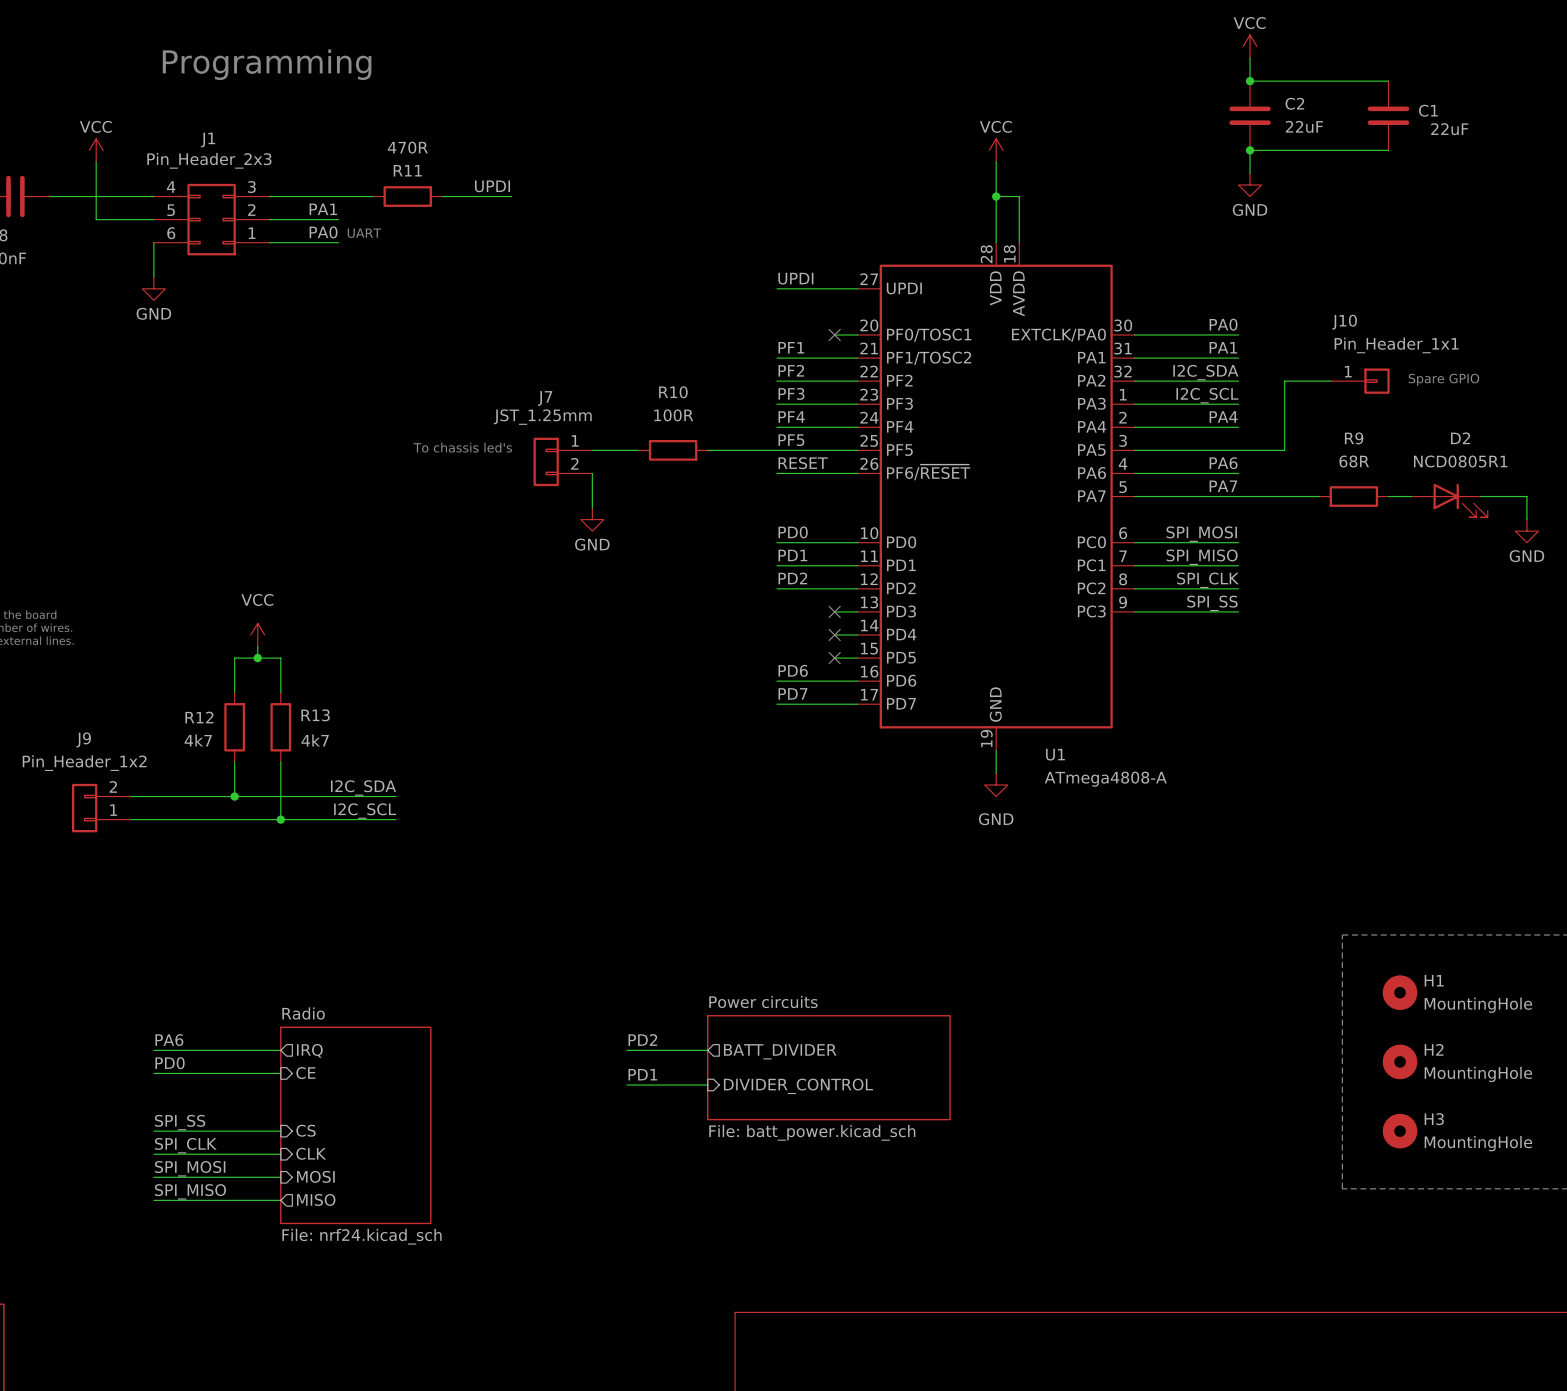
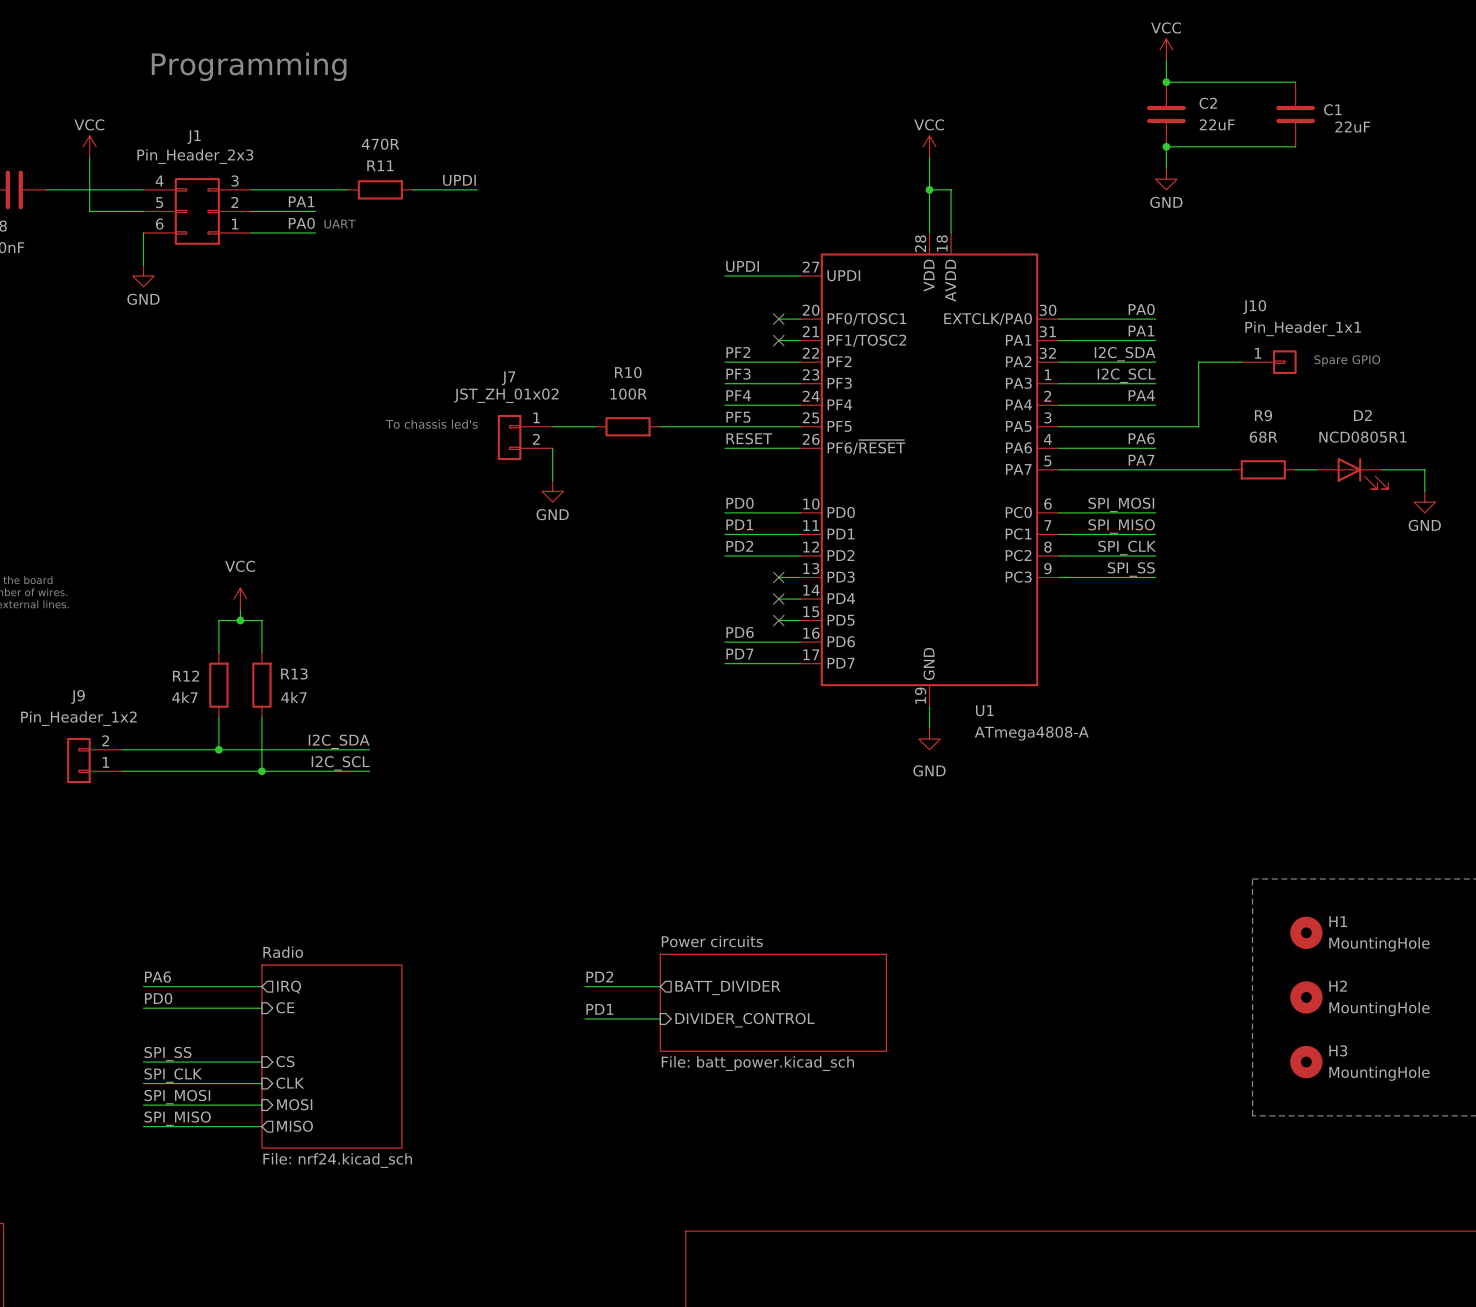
label: PF1 (791, 347) -> none
wire: (776, 358) (834, 358) -> none
no-connect mark: none -> (778, 340)
J7 value: JST_1.25mm (542, 417) -> JST_ZH_01x02 (506, 395)

